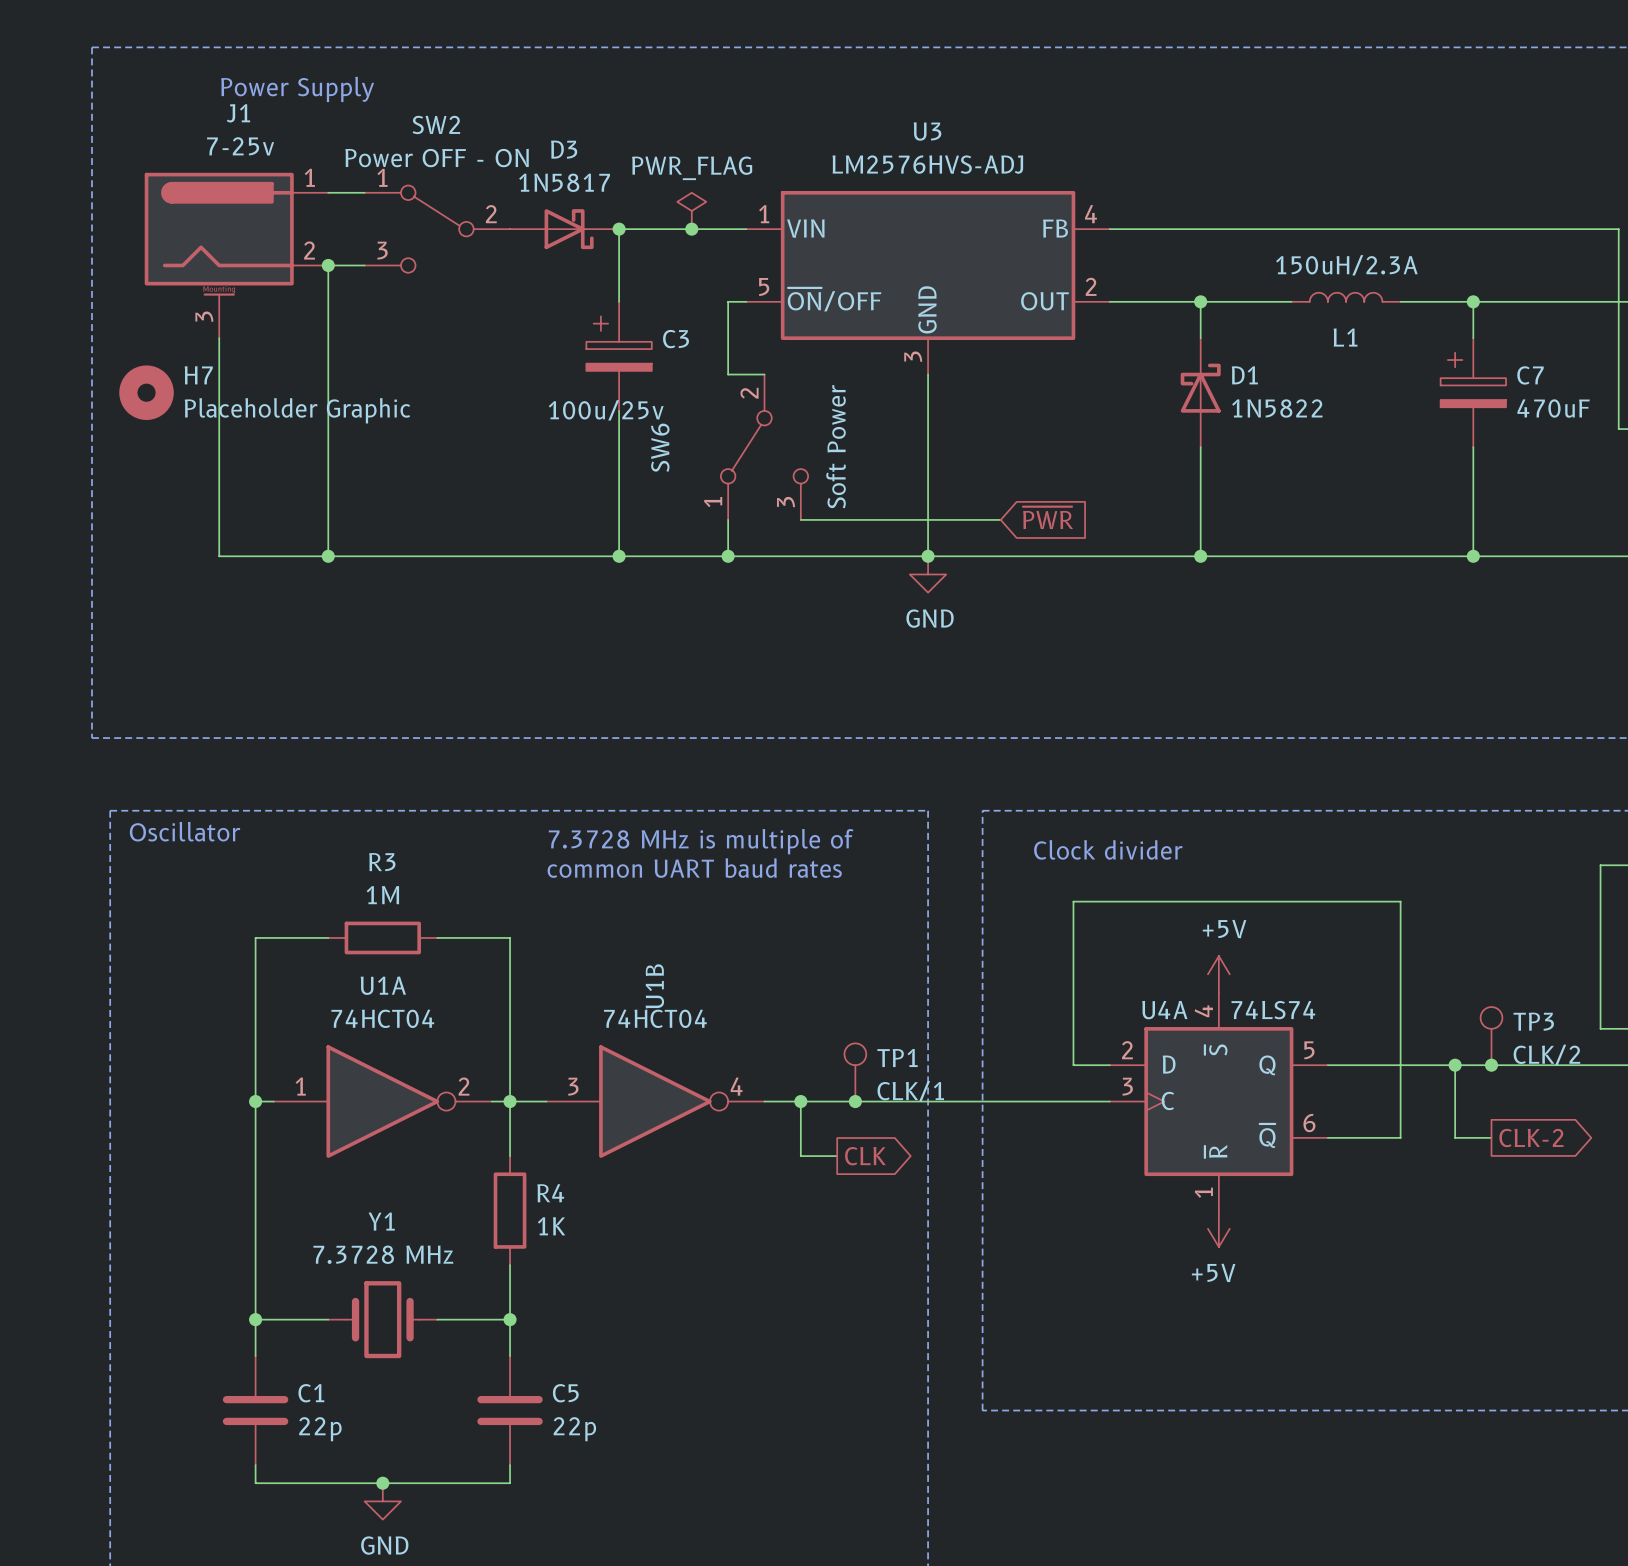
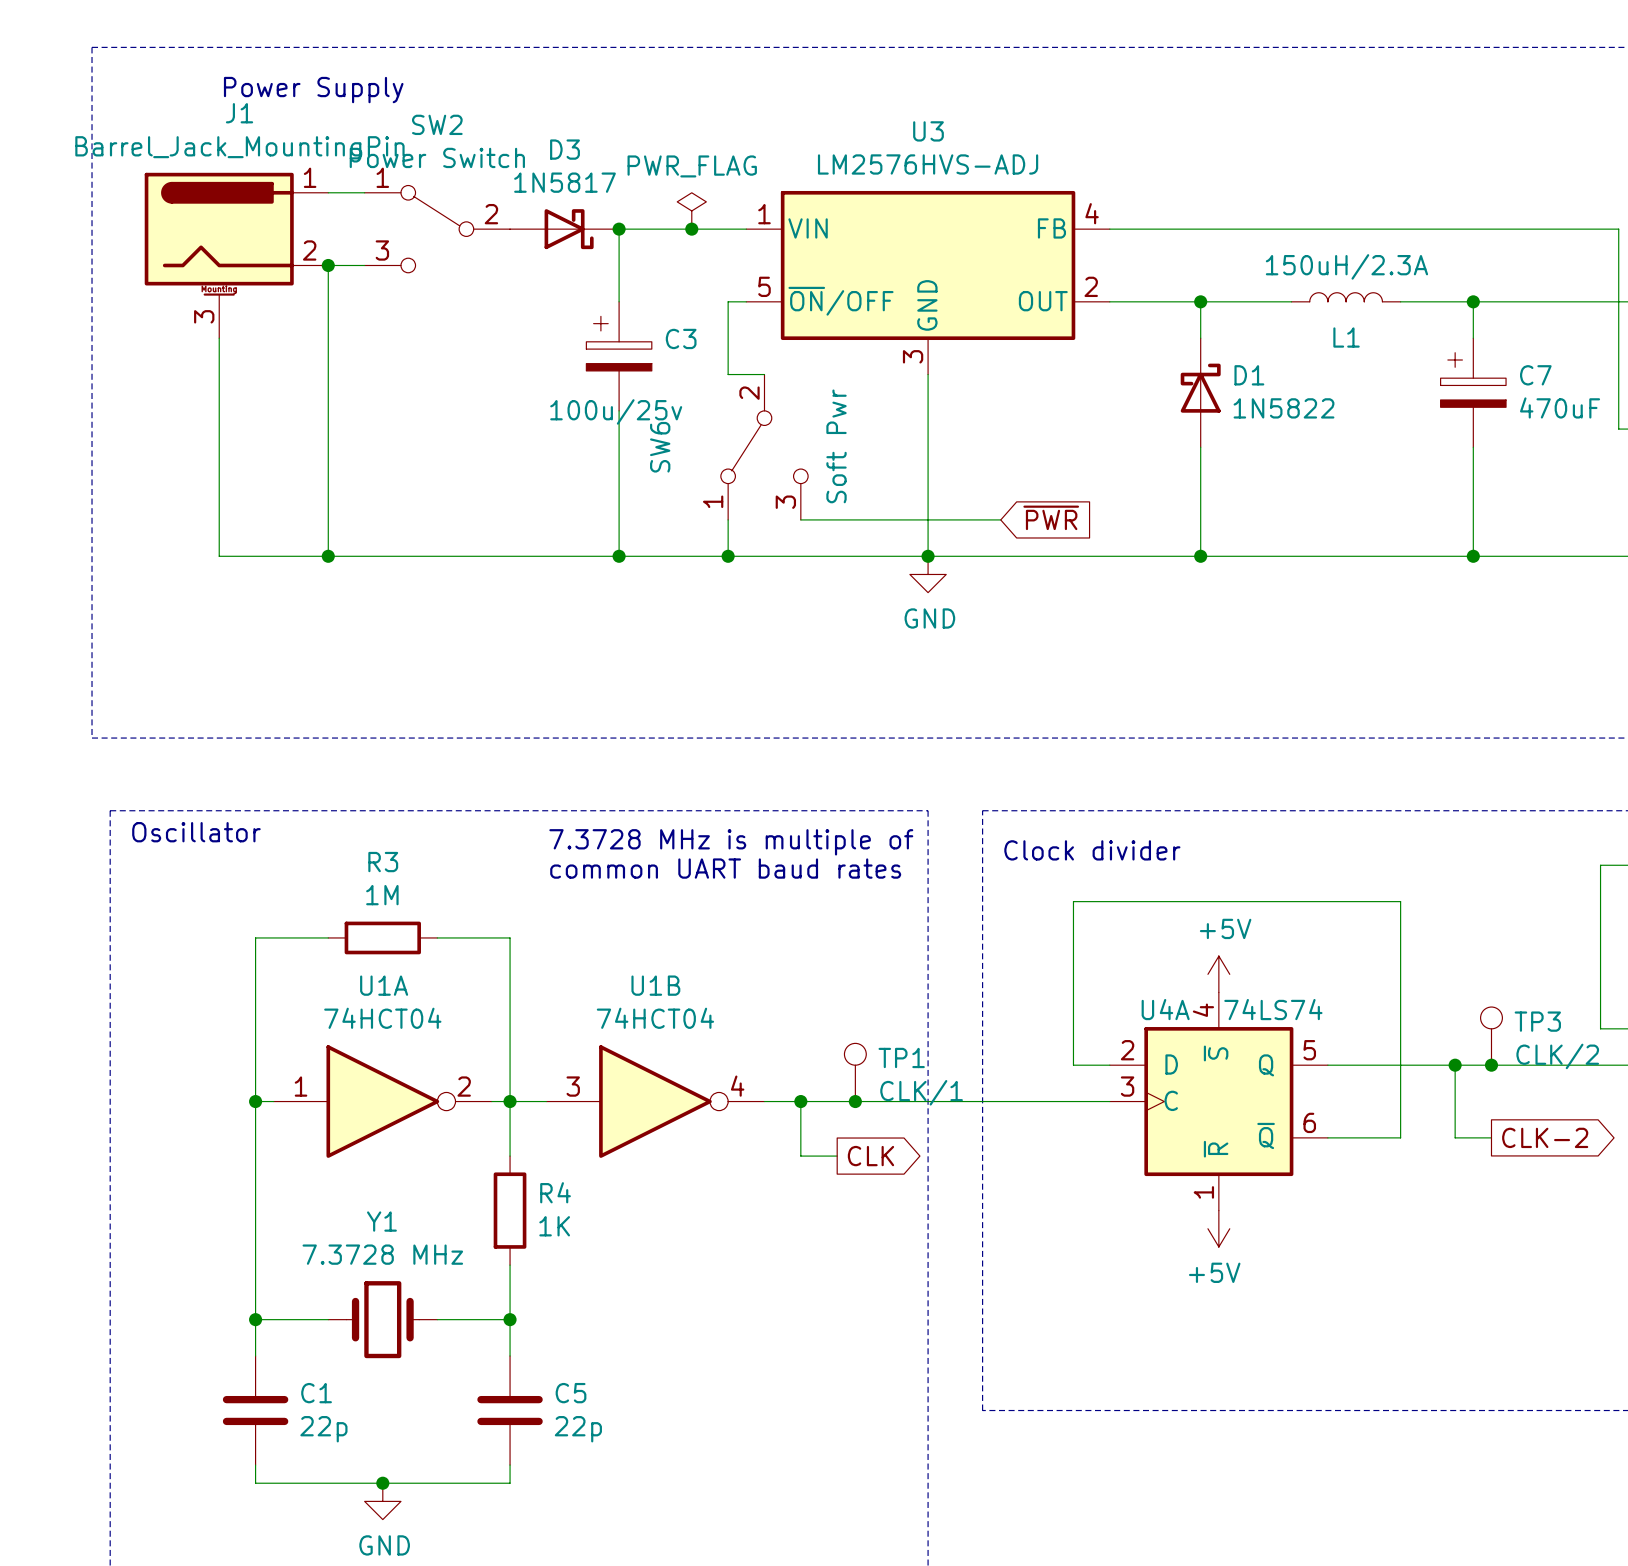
J1 value: 7-25v (240, 146) -> Barrel_Jack_MountingPin (239, 149)
SW2 value: Power OFF - ON (437, 158) -> Power Switch (437, 157)
H7: Placeholder Graphic (146, 392) -> none
SW6 value: Soft Power (836, 446) -> Soft Pwr (836, 446)
U1B name rotation: 0° (654, 986) -> 90° clockwise (655, 985)

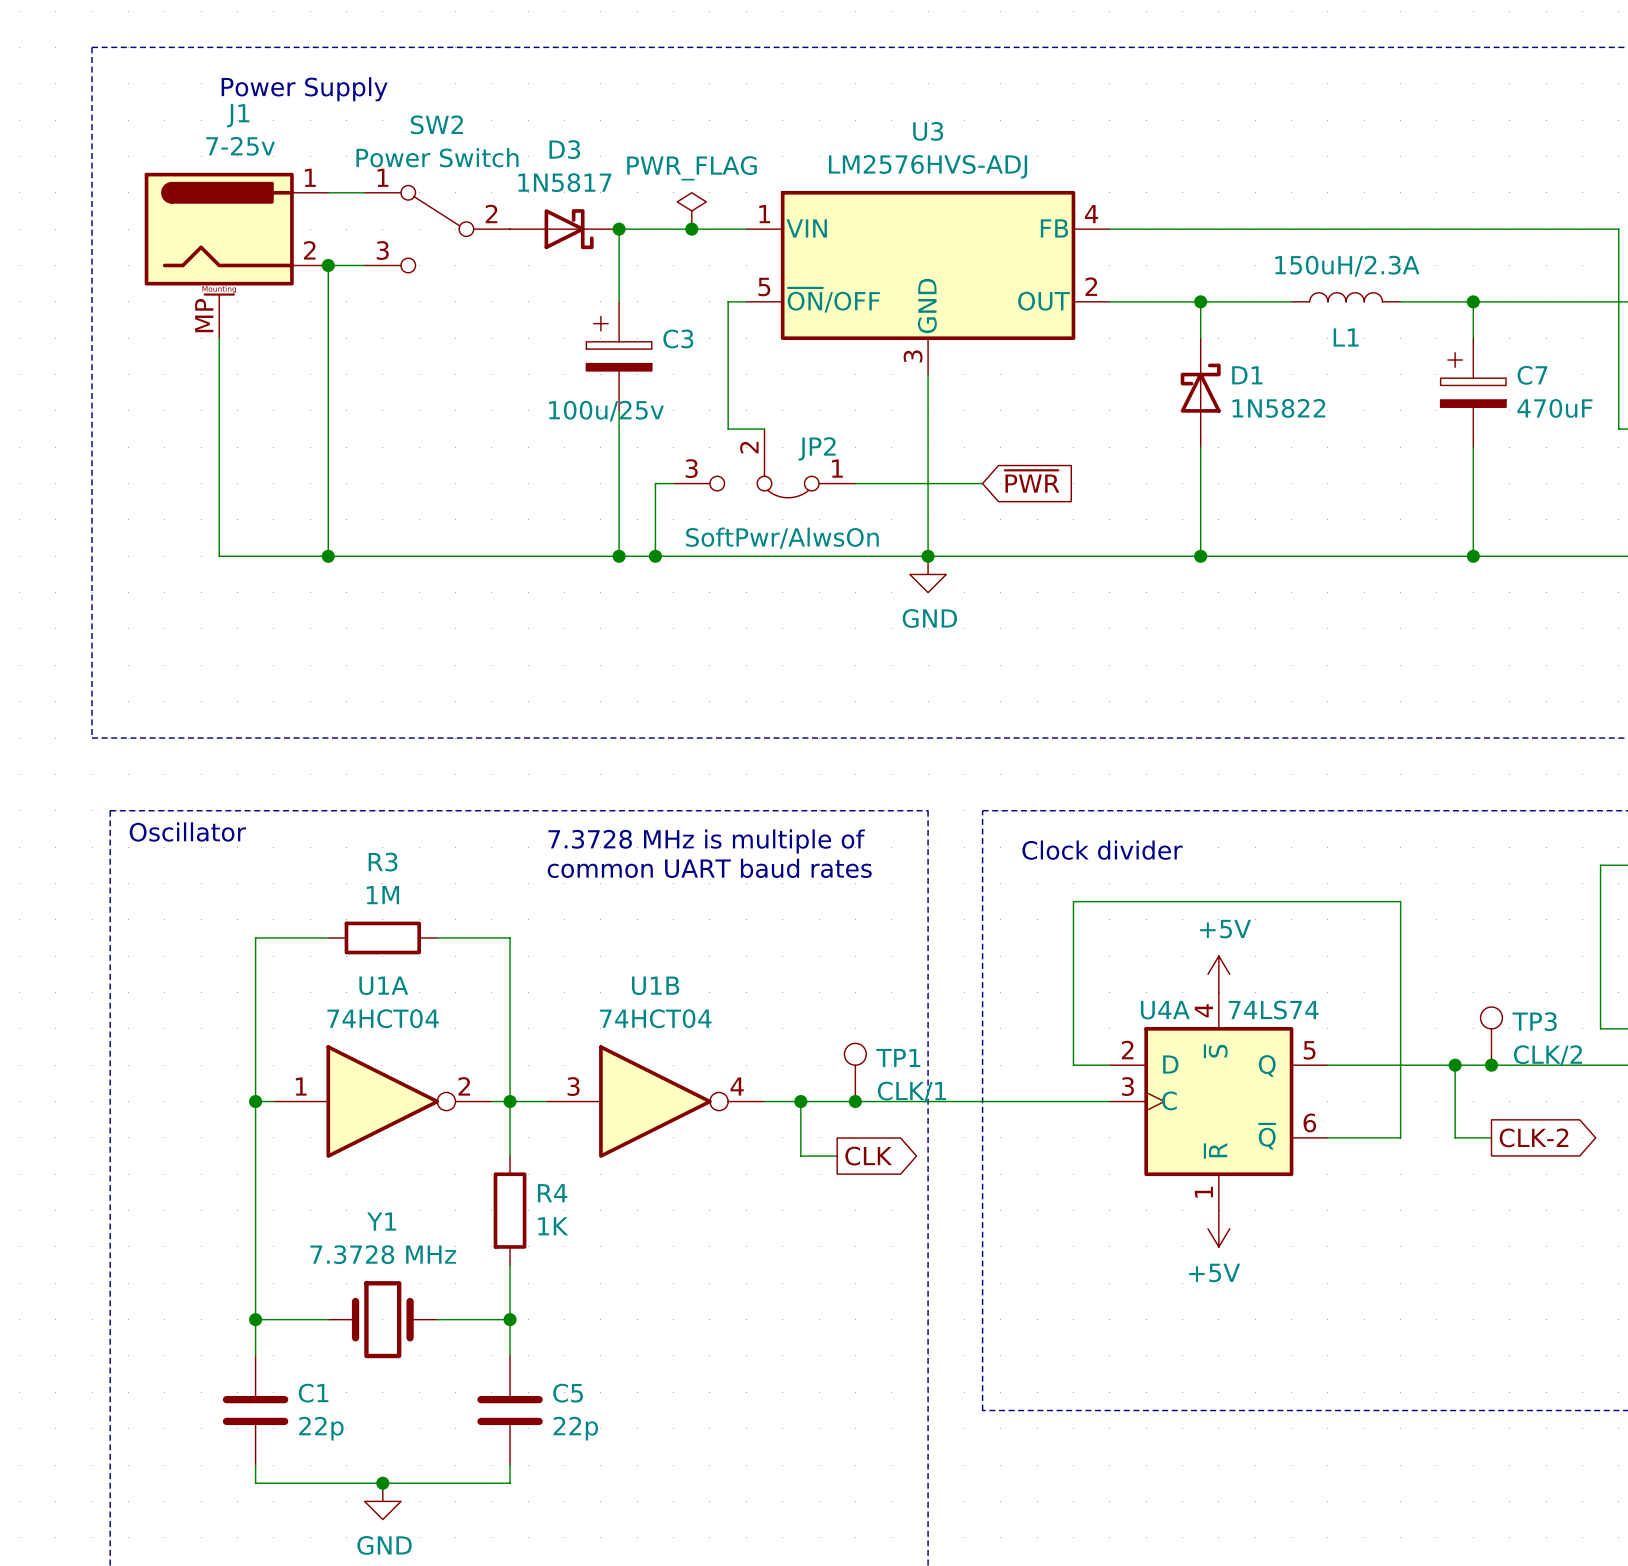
J1 value: Barrel_Jack_MountingPin (239, 149) -> 7-25v (240, 146)
J1 pin number: 3 (204, 316) -> MP (204, 315)
wire: (728, 374) (764, 374) -> (728, 374) (728, 429) (764, 429)
SW6: Soft Pwr (764, 447) -> none
JP2: none -> SoftPwr/AlwsOn (764, 463)
wire: none -> (673, 483) (655, 483) (655, 556)
wire: none -> (855, 483) (982, 483)
global label position: ~{PWR} (1051, 517) -> ~{PWR} (1032, 481)
wire: (728, 519) (728, 556) -> none
wire: (800, 519) (1000, 519) -> none
junction position: (728, 556) -> (655, 556)

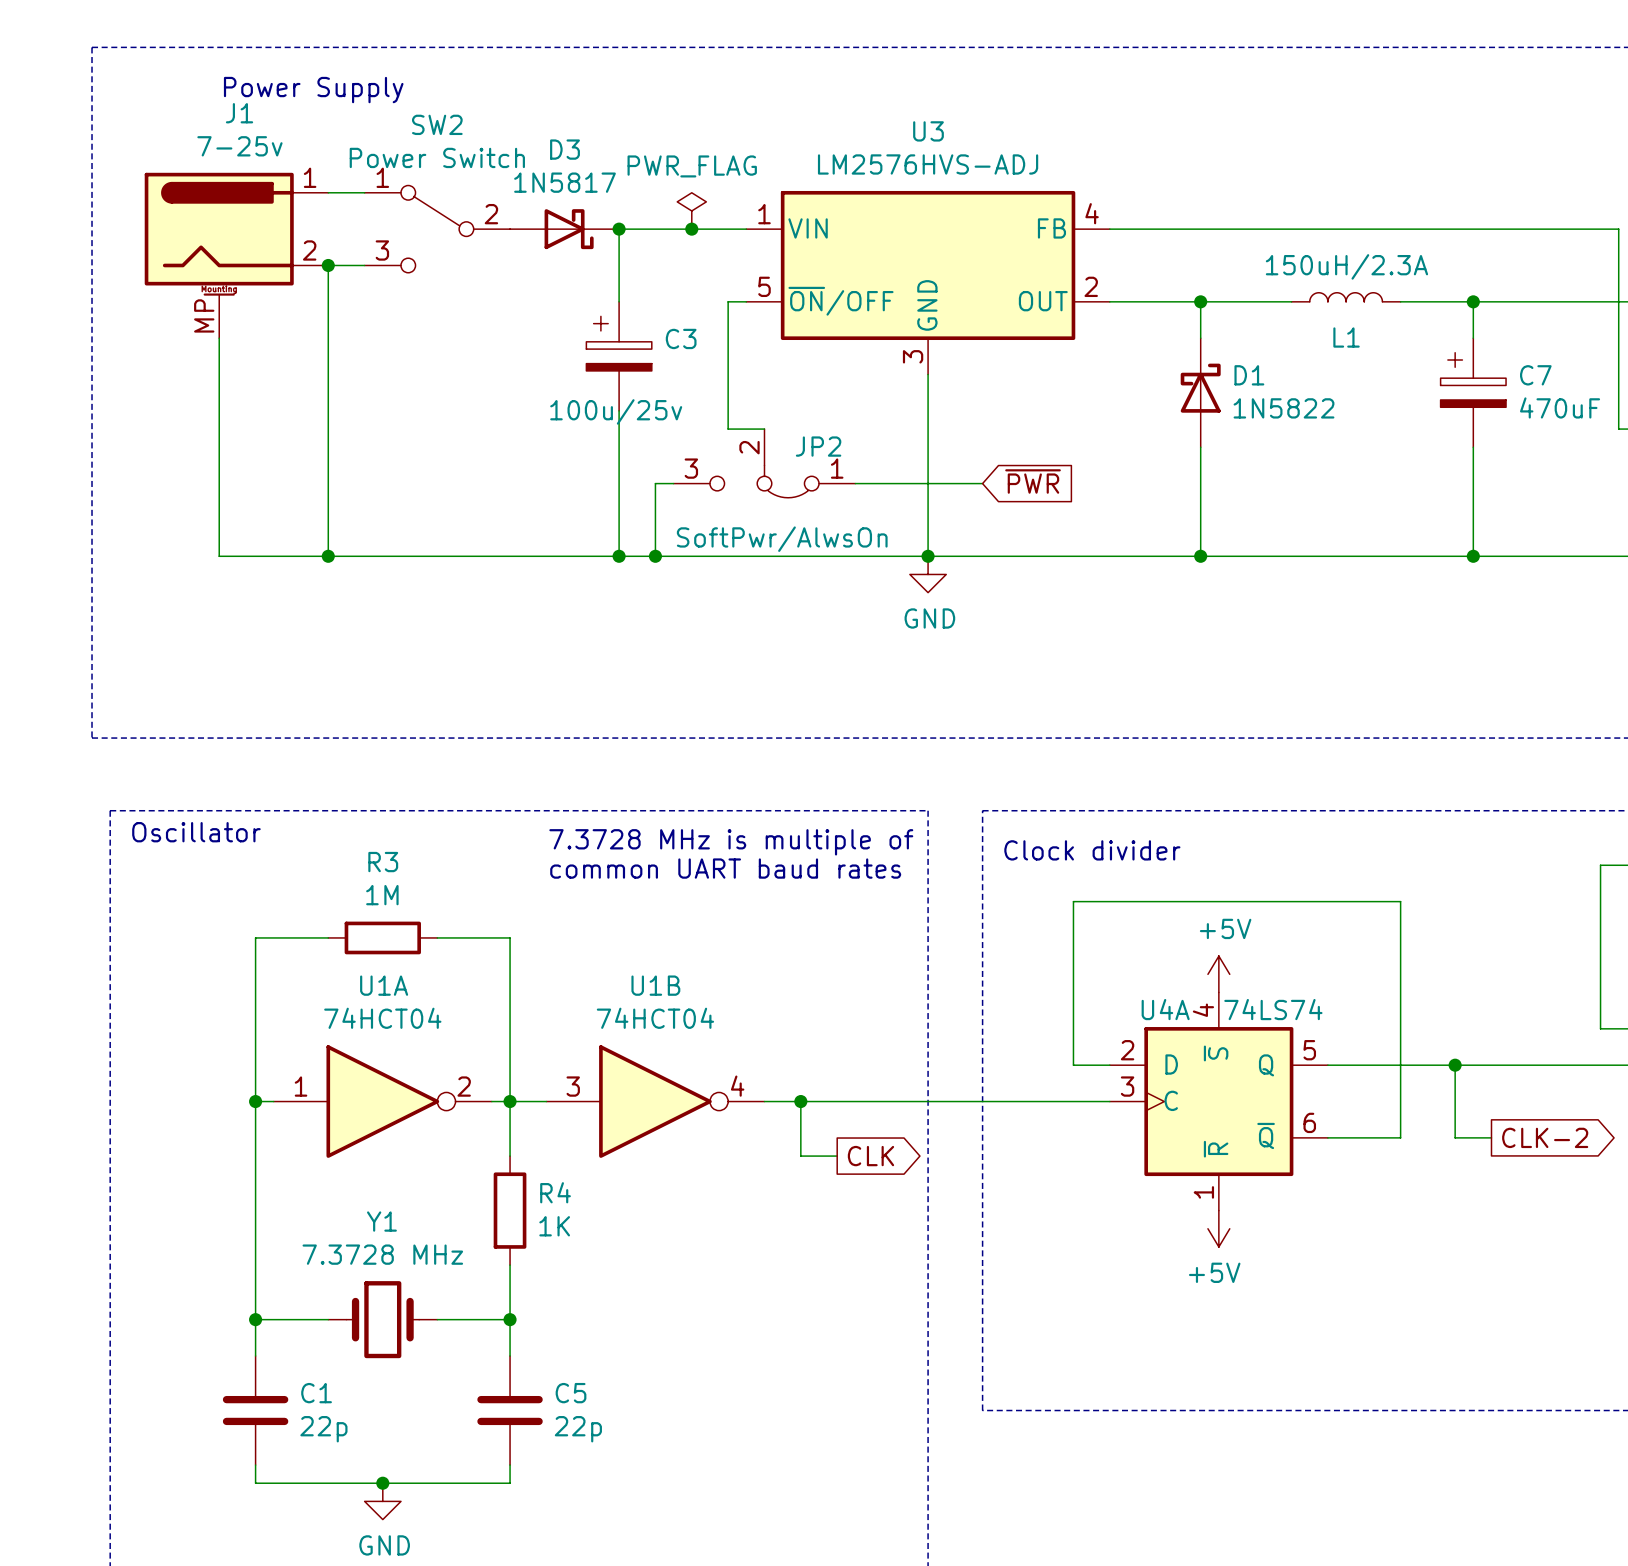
TP3: CLK/2 (1491, 1036) -> none
junction: (1491, 1065) -> none
TP1: CLK/1 (855, 1072) -> none
junction: (855, 1101) -> none

